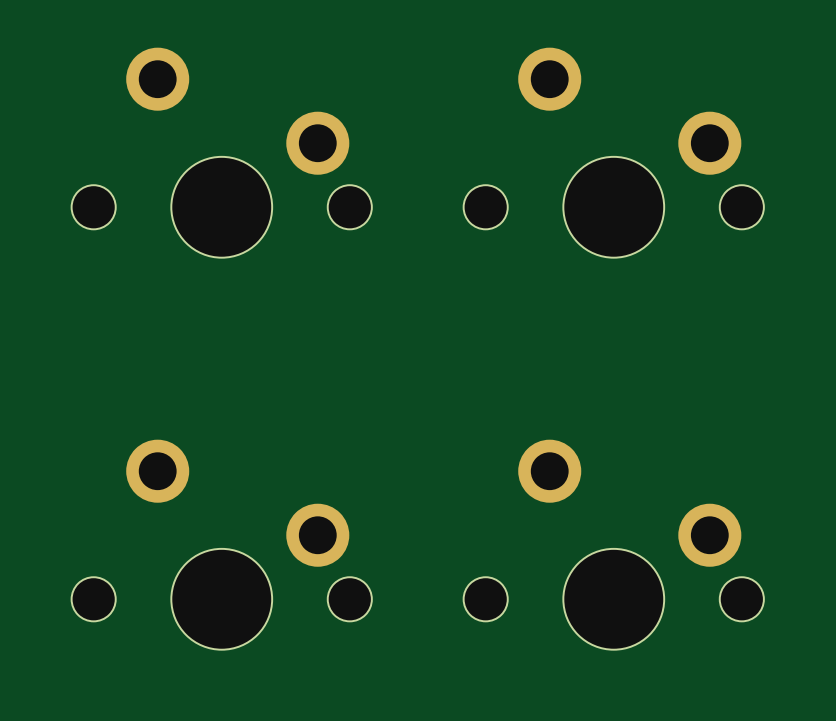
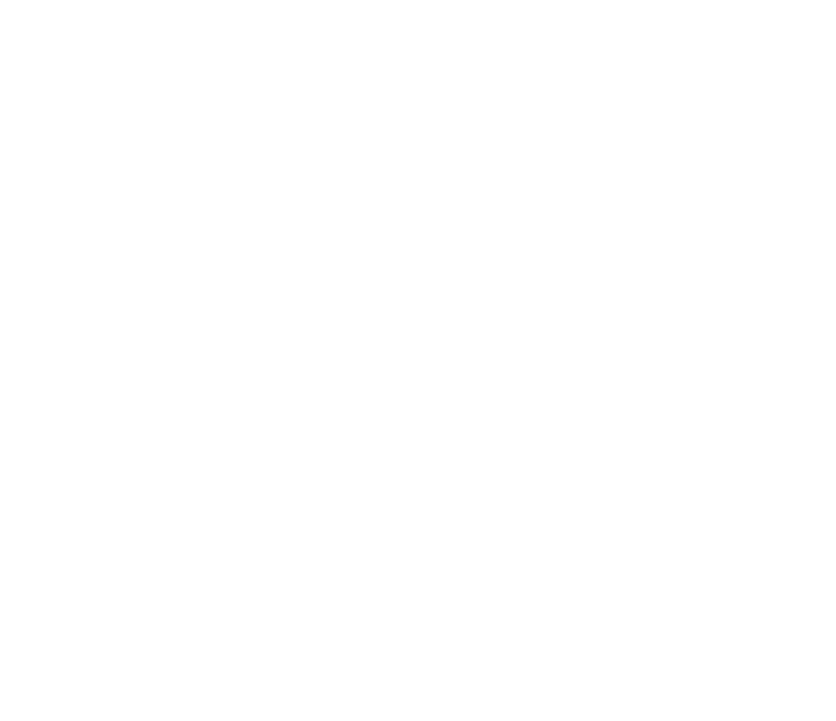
part: (221, 152) -> none
part: (613, 152) -> none
part: (221, 544) -> none
part: (613, 544) -> none

